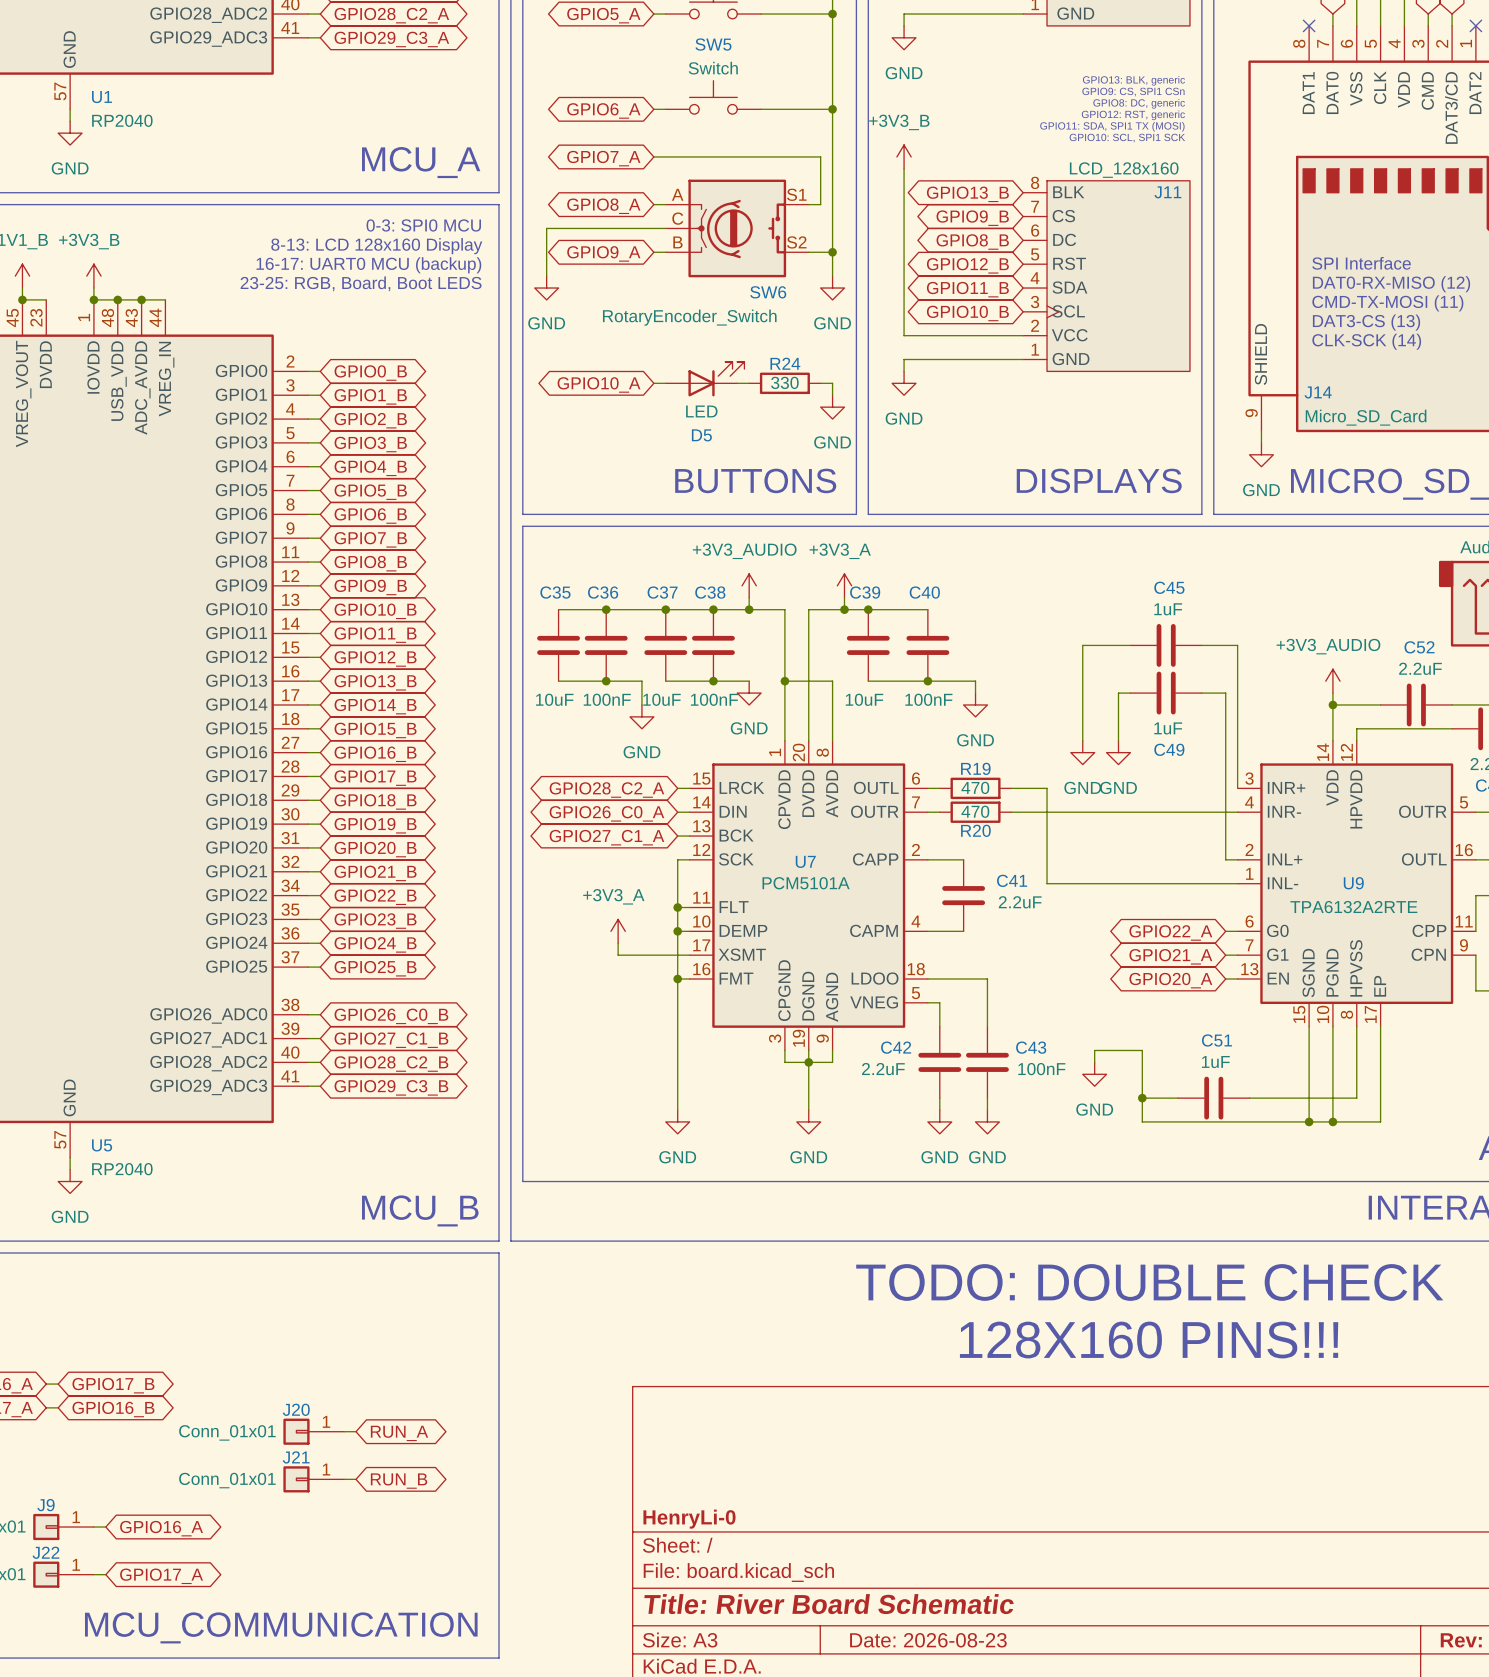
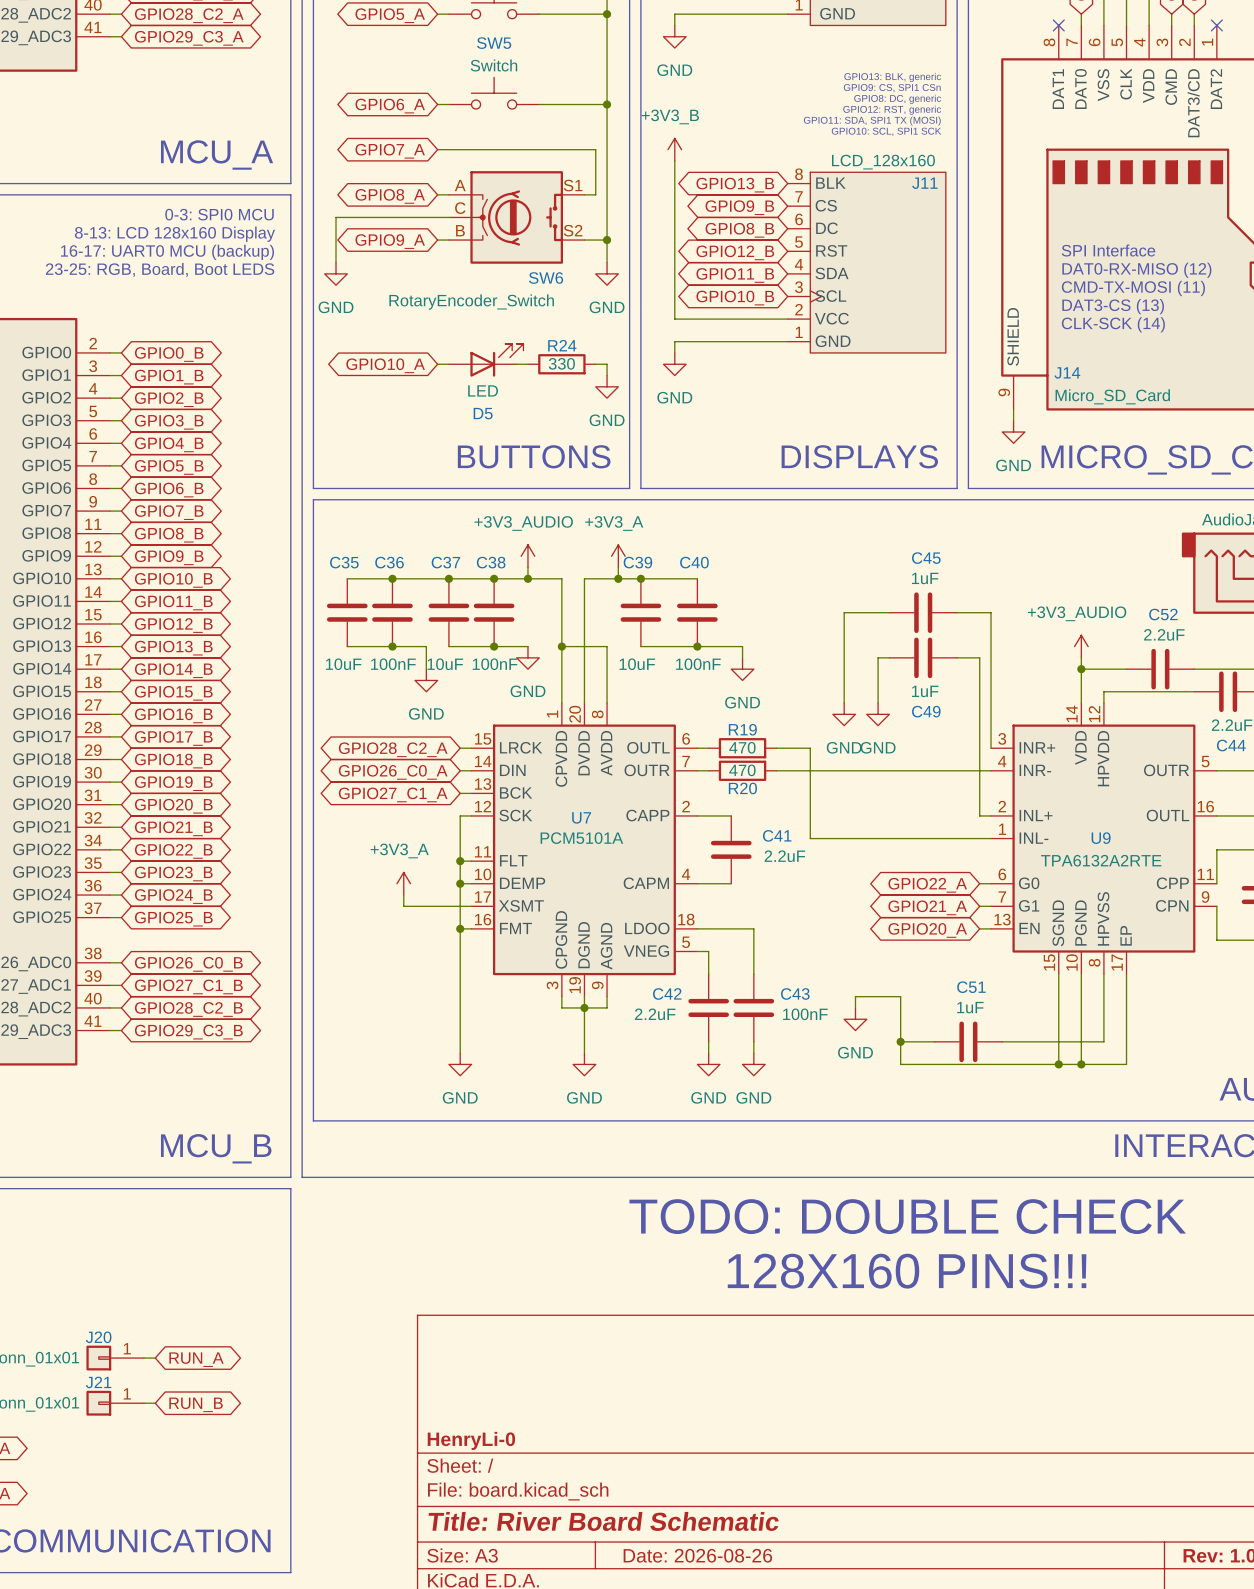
title block: Date: 2026-08-23 (928, 1640) -> Date: 2026-08-26 (697, 1555)

